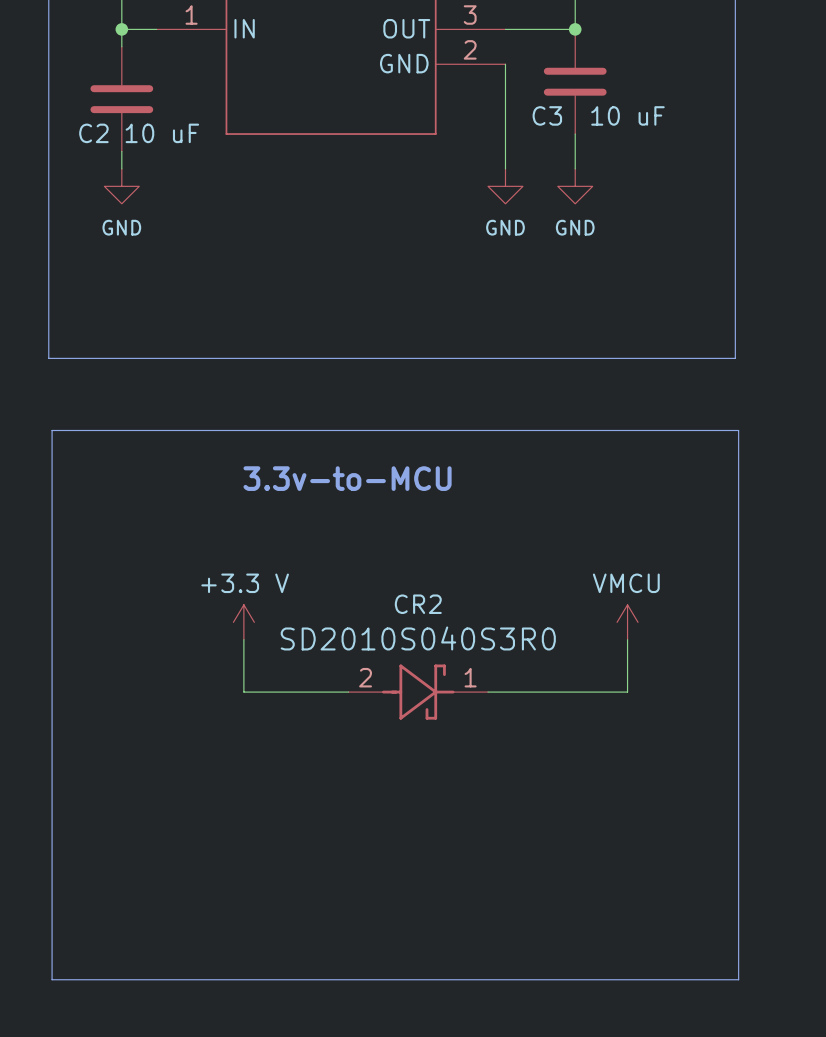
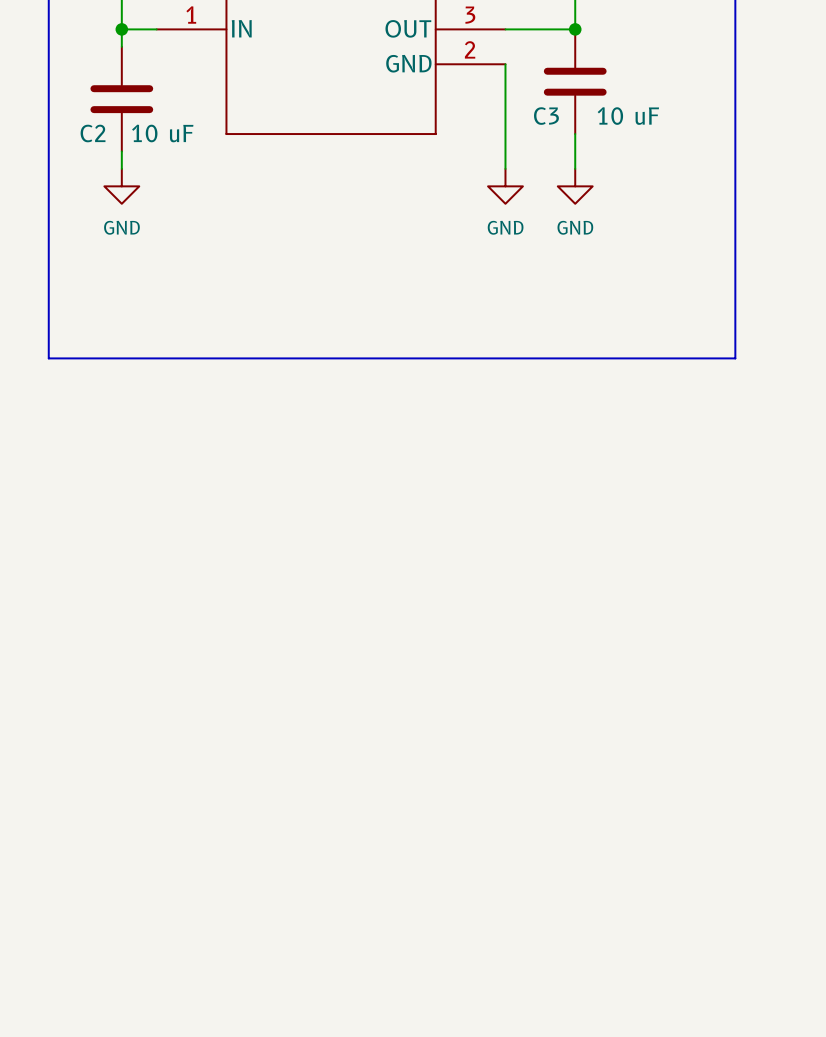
line: (52, 430) (738, 430) (738, 979) (52, 979) (52, 430) -> none
text: 3.3v-to-MCU (347, 478) -> none
power symbol: +3.3 V (243, 622) -> none
power symbol: VMCU (627, 622) -> none
wire: (243, 639) (243, 692) (348, 692) -> none
wire: (627, 639) (627, 692) (488, 692) -> none
CR2: SD2010S040S3R0 (418, 692) -> none

